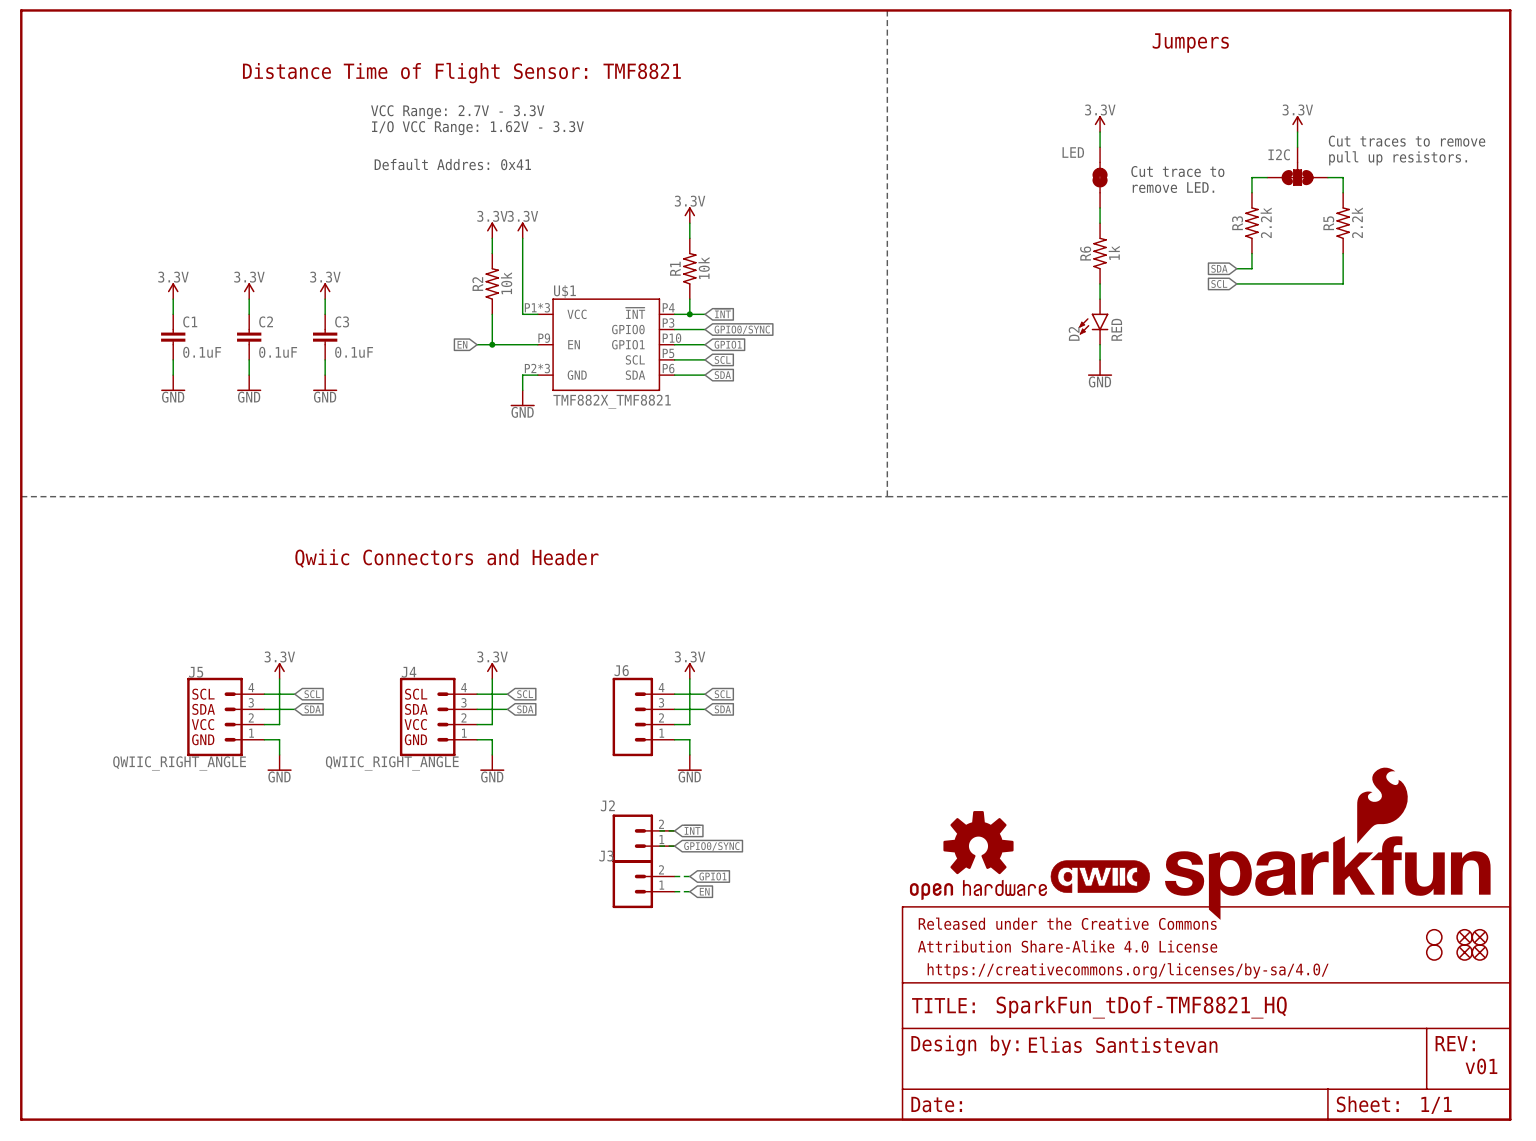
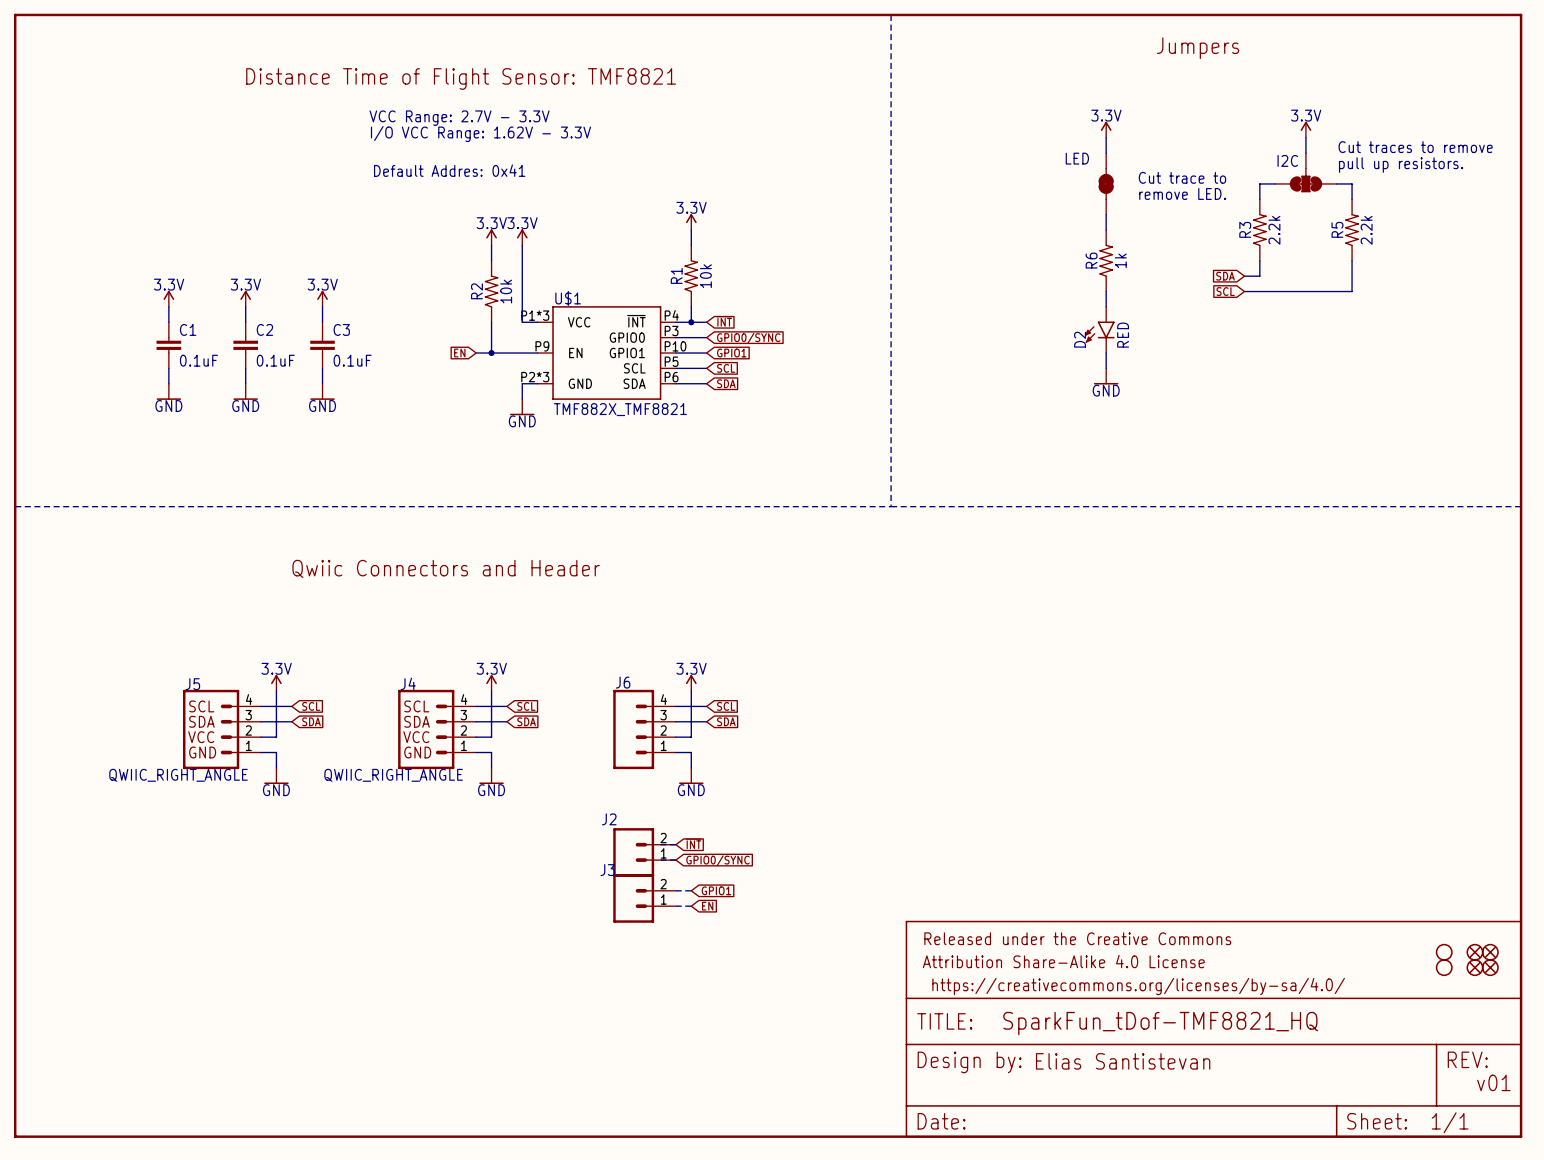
part: (1327, 843) -> none
part: (978, 855) -> none
part: (1100, 876) -> none

